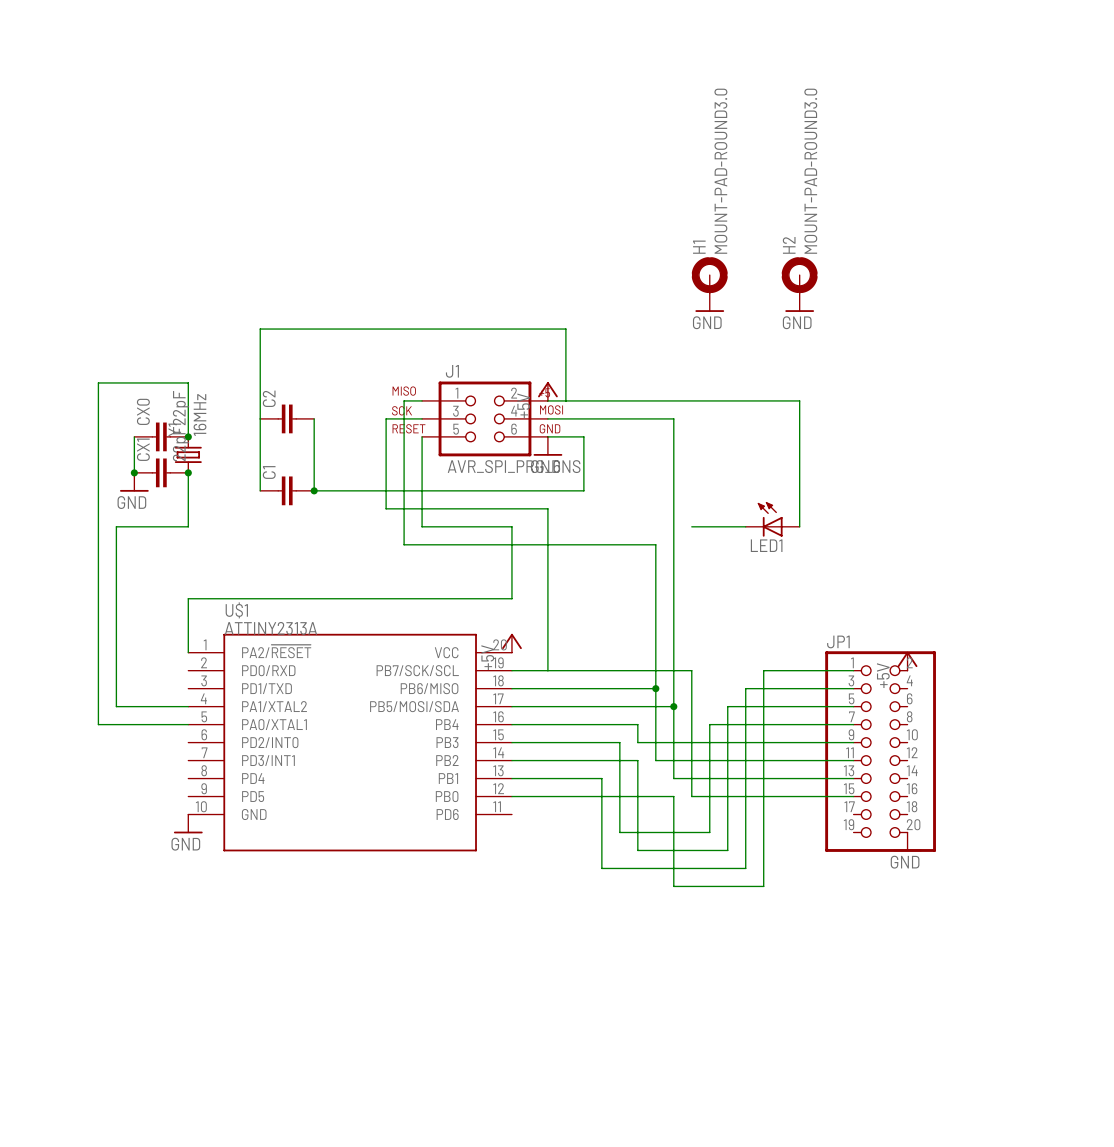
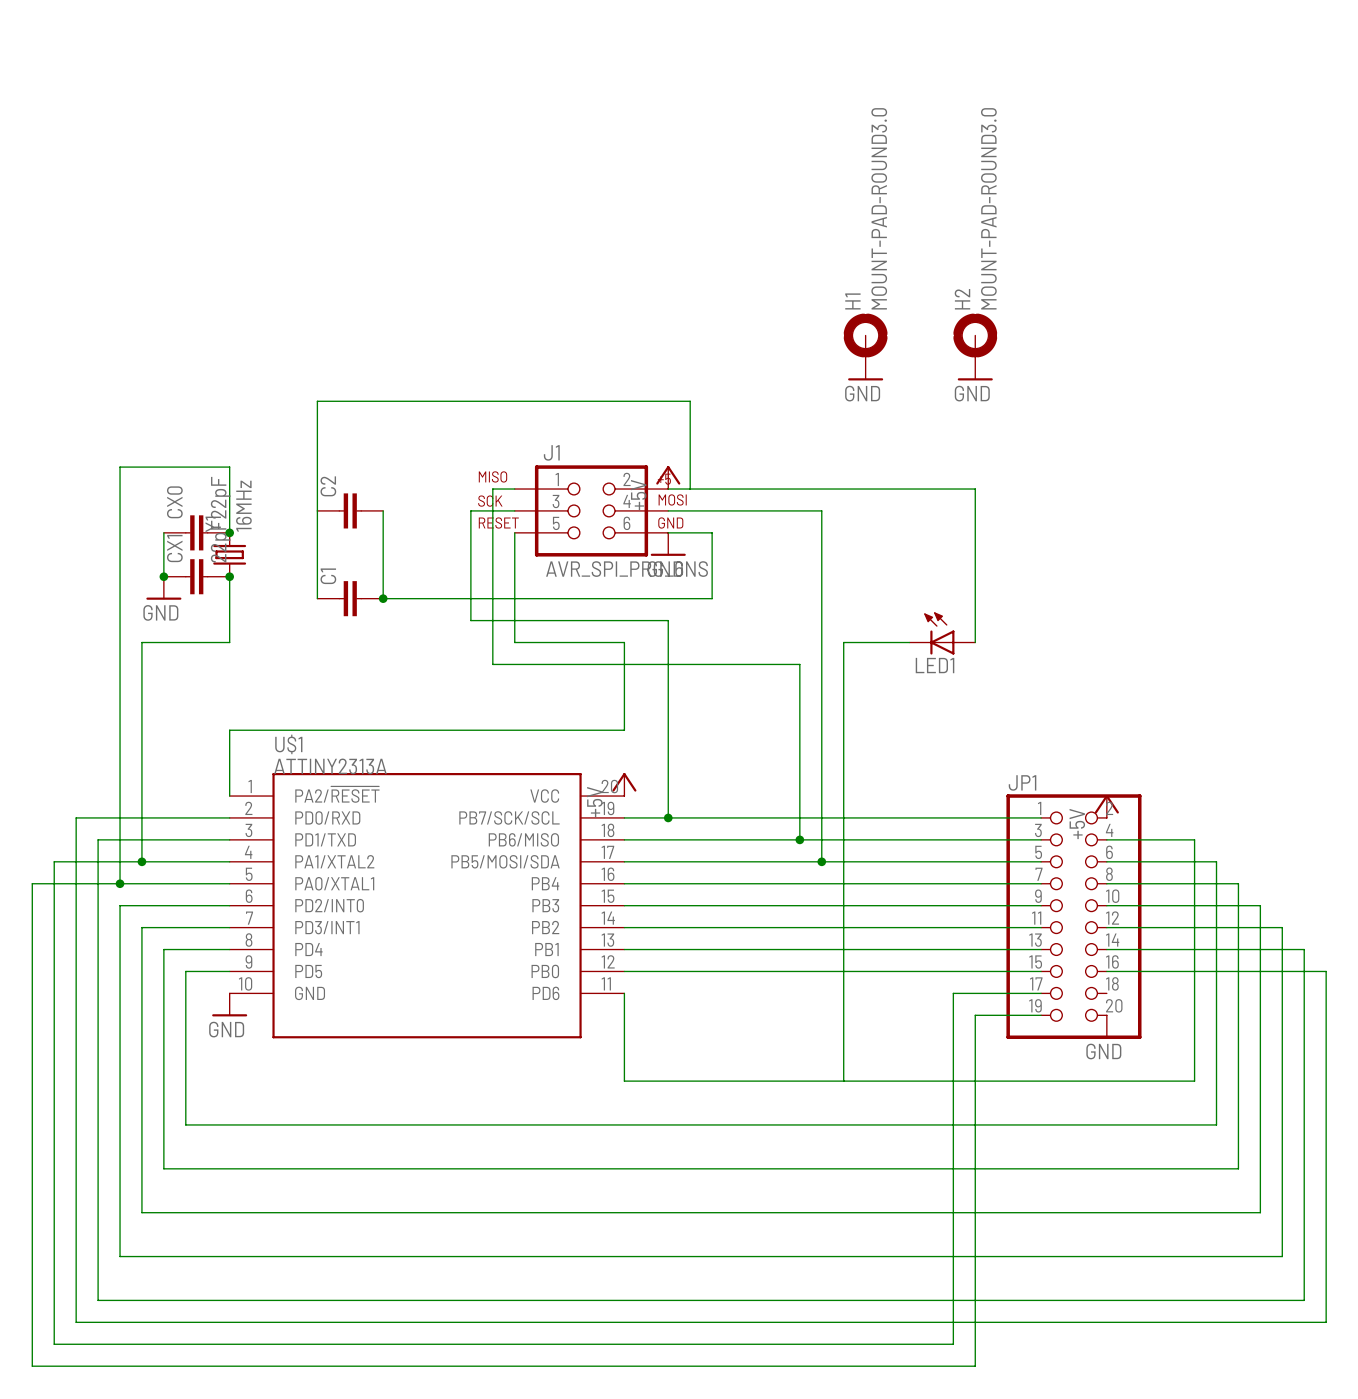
wire: none -> (843, 642) (843, 817) (931, 817)
wire: none -> (229, 817) (76, 817) (76, 1322) (1326, 1322) (1326, 971) (1106, 971)
junction: none -> (668, 817)
wire: (763, 670) (763, 886) -> (1106, 839) (1194, 839) (1194, 1081) (931, 1081)
wire: none -> (229, 839) (98, 839) (98, 1300) (1304, 1300) (1304, 949) (1106, 949)
wire: (655, 688) (655, 760) -> (777, 927) (799, 927)
wire: (745, 688) (745, 868) (601, 868) (601, 778) -> (909, 839) (799, 839)
wire: none -> (141, 861) (54, 861) (54, 1344) (953, 1344) (953, 993) (1041, 993)
junction: none -> (141, 861)
wire: (673, 706) (673, 778) -> (734, 949) (821, 949)
wire: (727, 706) (727, 850) (637, 850) (637, 760) -> (887, 861) (821, 861)
wire: none -> (1106, 861) (1216, 861) (1216, 1124) (185, 1124) (185, 971) (229, 971)
wire: none -> (120, 883) (32, 883) (32, 1366) (975, 1366) (975, 1015) (1041, 1015)
junction: none -> (120, 883)
wire: (637, 724) (637, 742) -> (755, 905) (777, 905)
wire: (709, 724) (709, 832) (619, 832) (619, 742) -> (865, 883) (777, 883)
wire: none -> (1106, 883) (1238, 883) (1238, 1168) (163, 1168) (163, 949) (229, 949)
wire: none -> (229, 905) (120, 905) (120, 1256) (1282, 1256) (1282, 927) (1106, 927)
wire: none -> (1106, 905) (1260, 905) (1260, 1212) (141, 1212) (141, 927) (229, 927)
wire: (673, 796) (673, 886) -> (821, 971) (843, 971) (843, 1081)
wire: none -> (624, 993) (624, 1081) (821, 1081)

